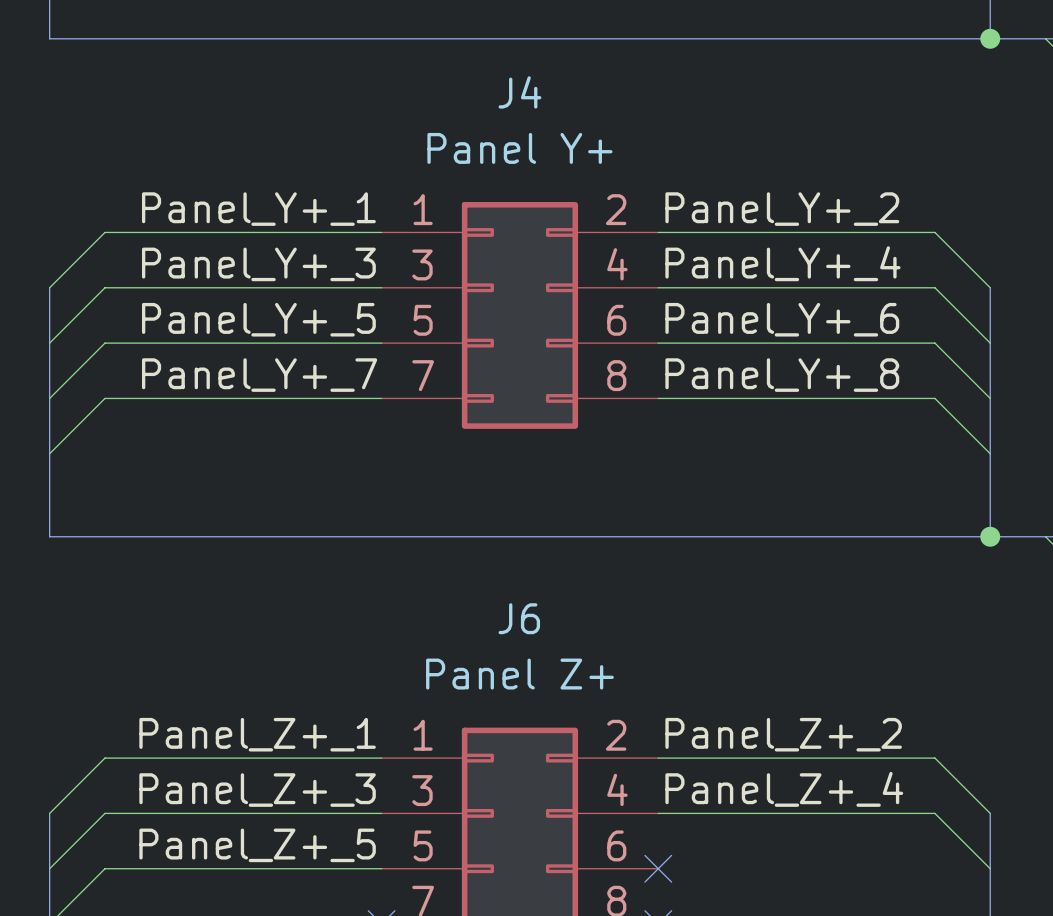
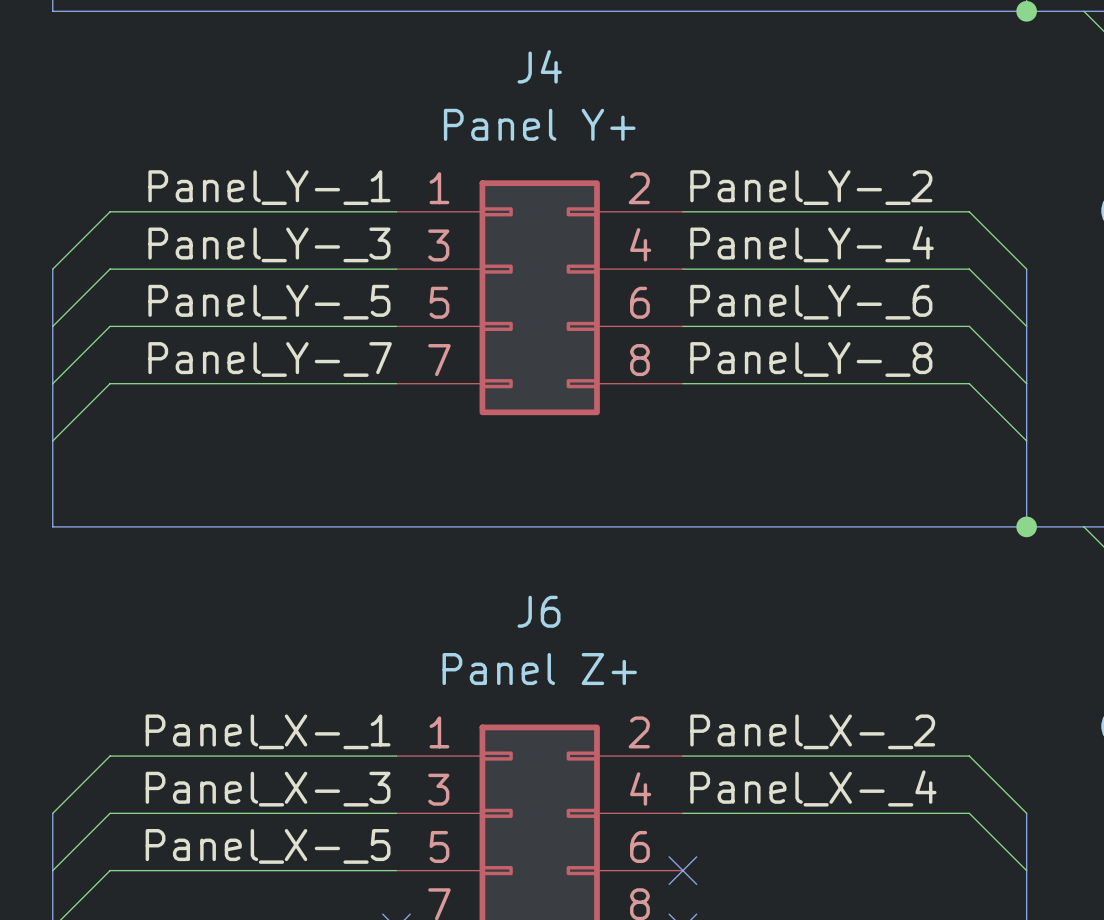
label: Panel_Y+_1 (258, 209) -> Panel_Y-_1 (269, 187)
label: Panel_Y+_2 (782, 209) -> Panel_Y-_2 (811, 187)
label: Panel_Y+_4 (782, 263) -> Panel_Y-_4 (812, 244)
label: Panel_Y+_3 (258, 264) -> Panel_Y-_3 (269, 244)
label: Panel_Y+_5 (258, 319) -> Panel_Y-_5 (269, 302)
label: Panel_Y+_6 (782, 319) -> Panel_Y-_6 (811, 302)
label: Panel_Y+_7 (259, 375) -> Panel_Y-_7 (270, 359)
label: Panel_Y+_8 (782, 375) -> Panel_Y-_8 (811, 359)
label: Panel_Z+_1 (257, 734) -> Panel_X-_1 (268, 731)
label: Panel_Z+_2 (783, 734) -> Panel_X-_2 (812, 731)
label: Panel_Z+_4 (784, 789) -> Panel_X-_4 (813, 788)
label: Panel_Z+_3 (257, 790) -> Panel_X-_3 (268, 789)
label: Panel_Z+_5 (257, 845) -> Panel_X-_5 (268, 846)

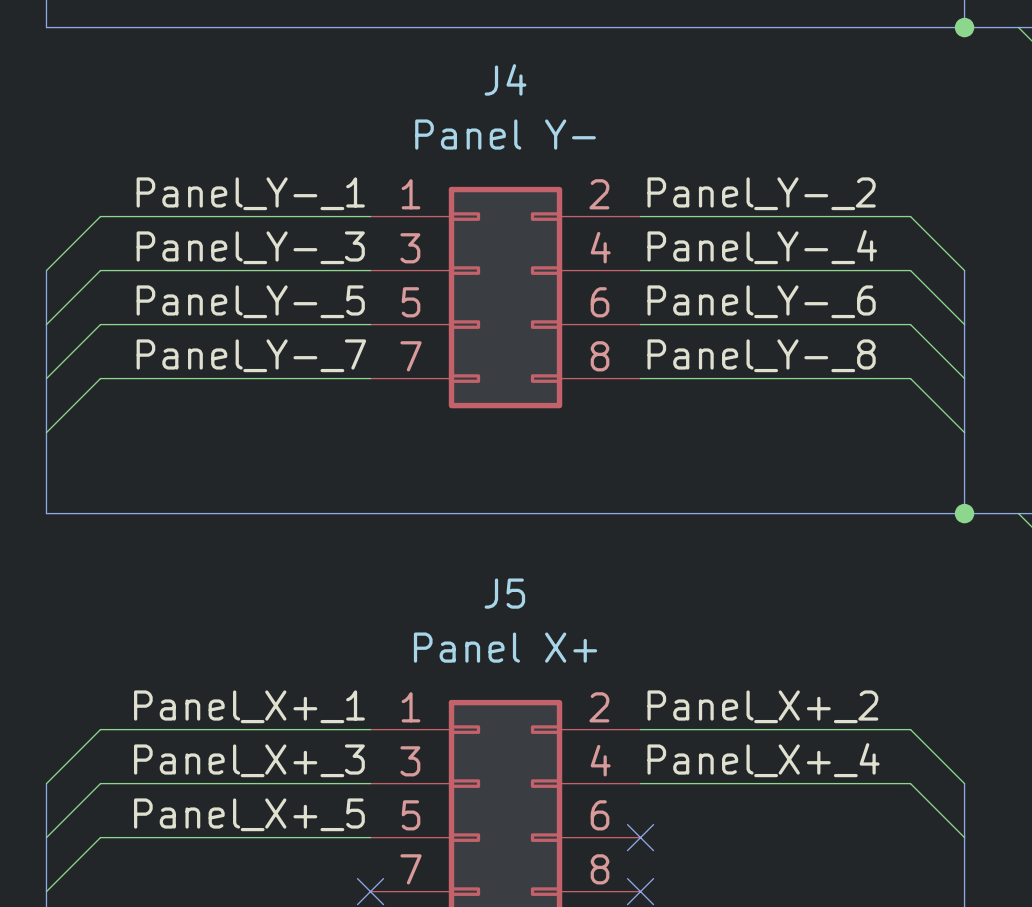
J4 value: Panel Y+ (539, 124) -> Panel Y- (505, 134)
J6 name: J6 (539, 611) -> J5 (504, 593)
J6 value: Panel Z+ (539, 669) -> Panel X+ (505, 647)
label: Panel_X-_1 (268, 731) -> Panel_X+_1 (249, 706)
label: Panel_X-_2 (812, 731) -> Panel_X+_2 (762, 706)
label: Panel_X-_4 (813, 788) -> Panel_X+_4 (763, 760)
label: Panel_X-_3 (268, 789) -> Panel_X+_3 (249, 760)
label: Panel_X-_5 (268, 846) -> Panel_X+_5 (249, 814)

